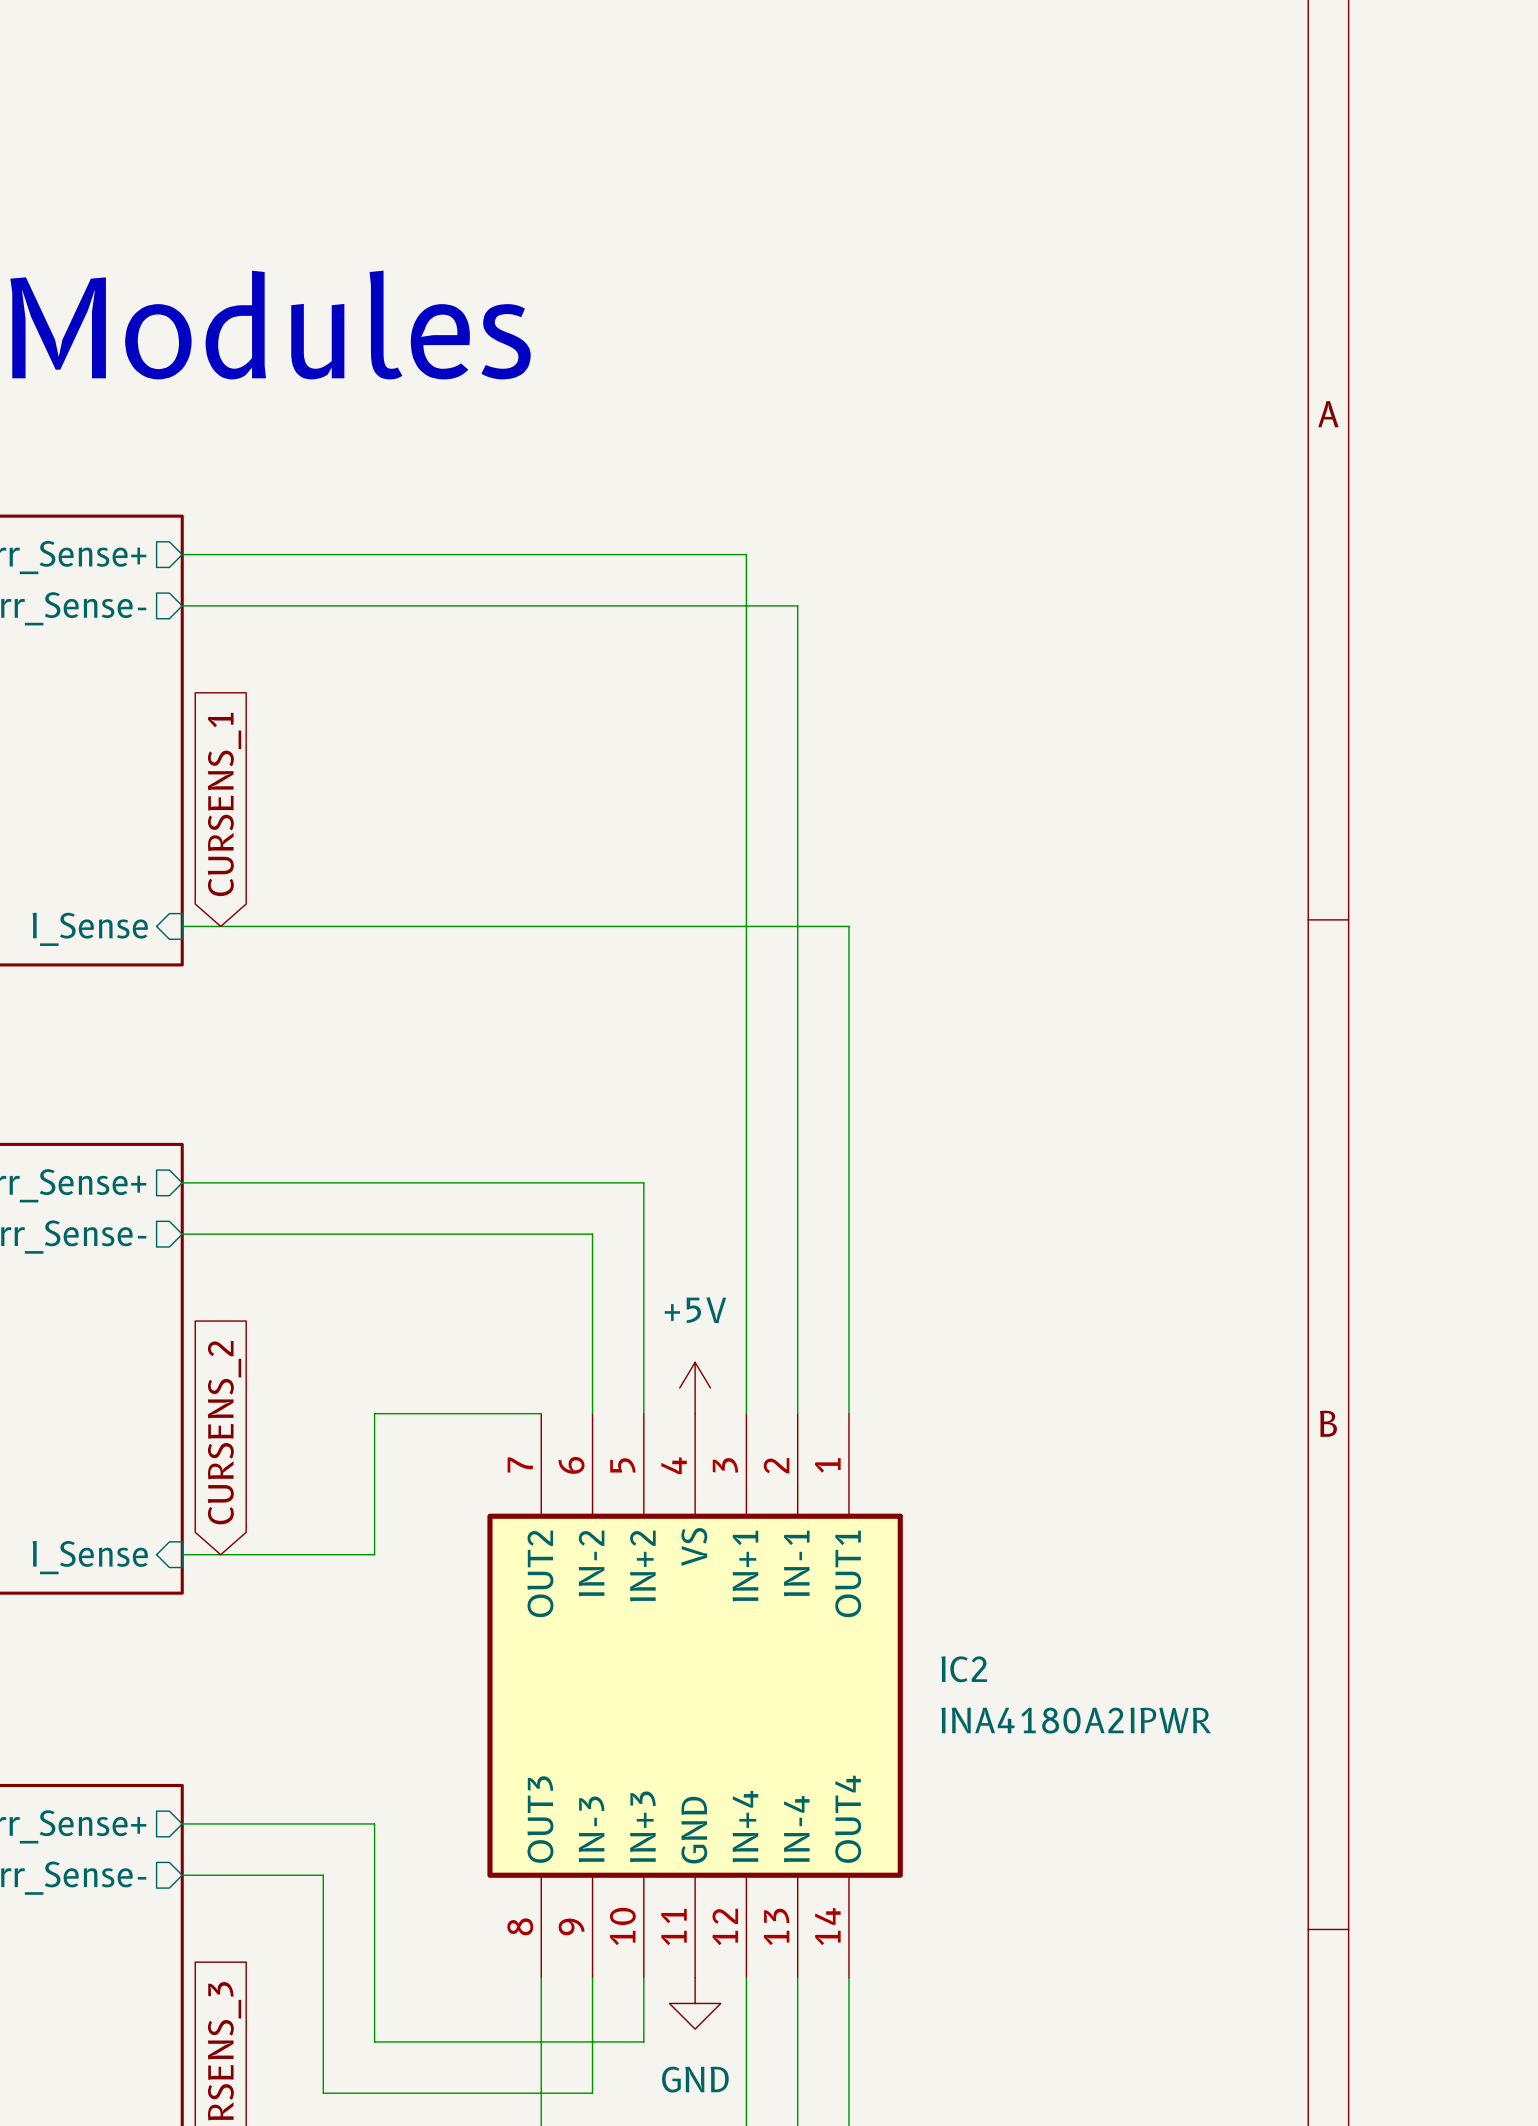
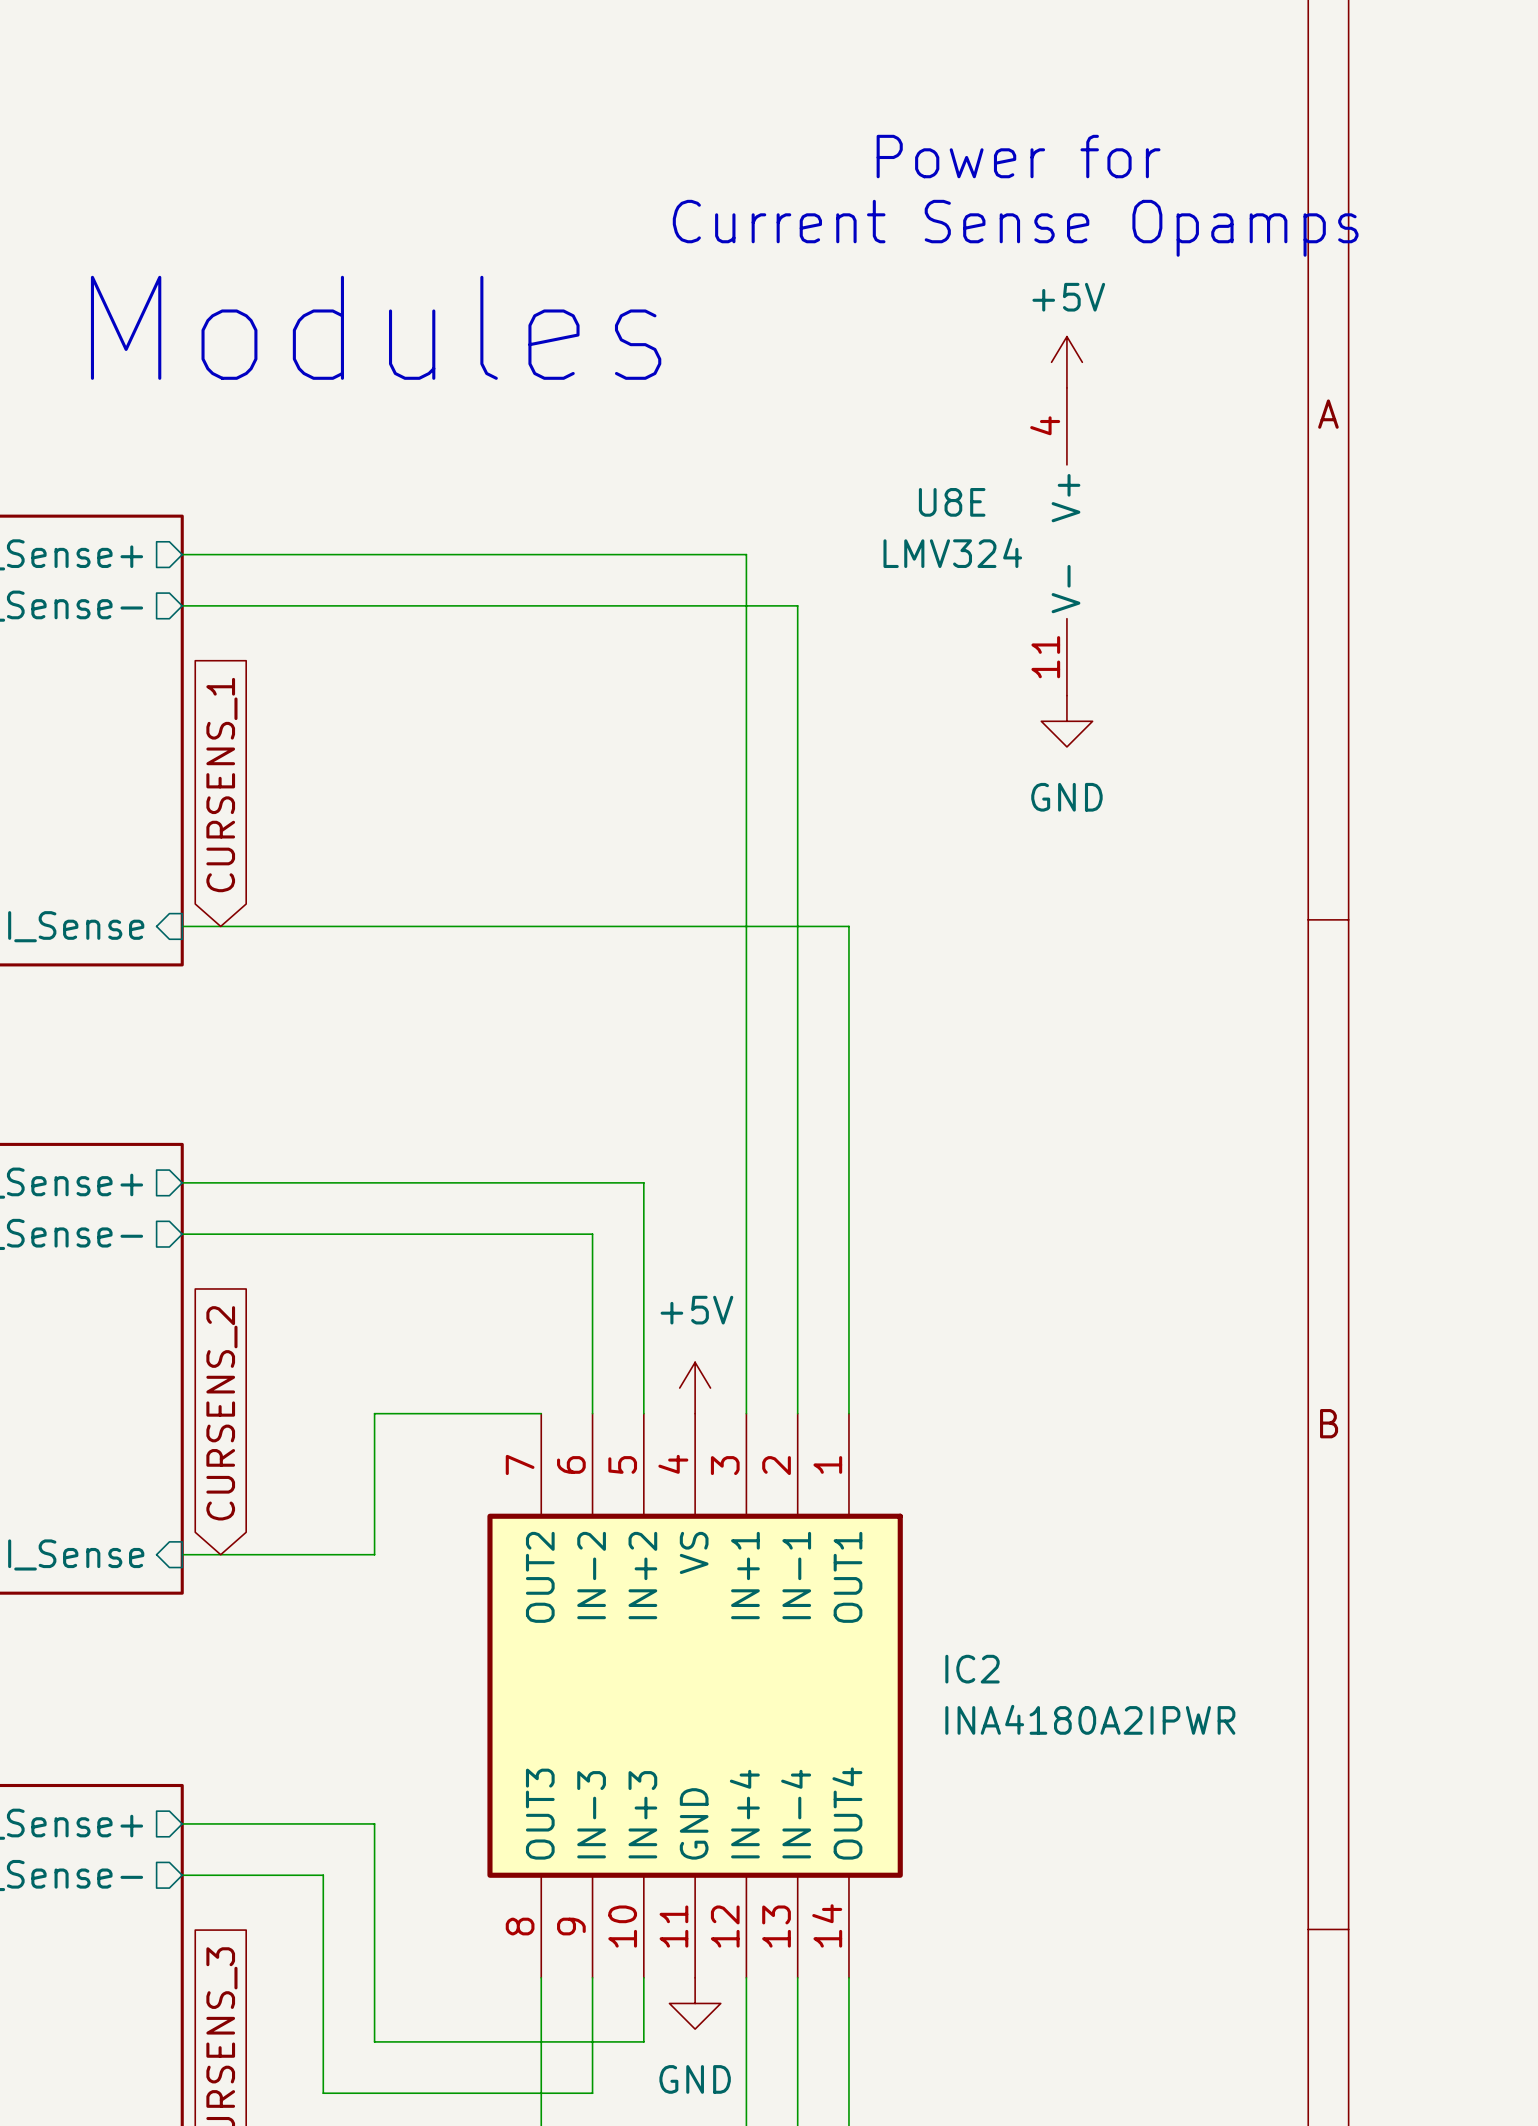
text: none -> Power for (1018, 156)
text: none -> Current Sense Opamps (1015, 228)
power symbol: none -> +5V (1066, 362)
U8E: none -> LMV324 (1066, 541)
power symbol: none -> GND (1066, 721)

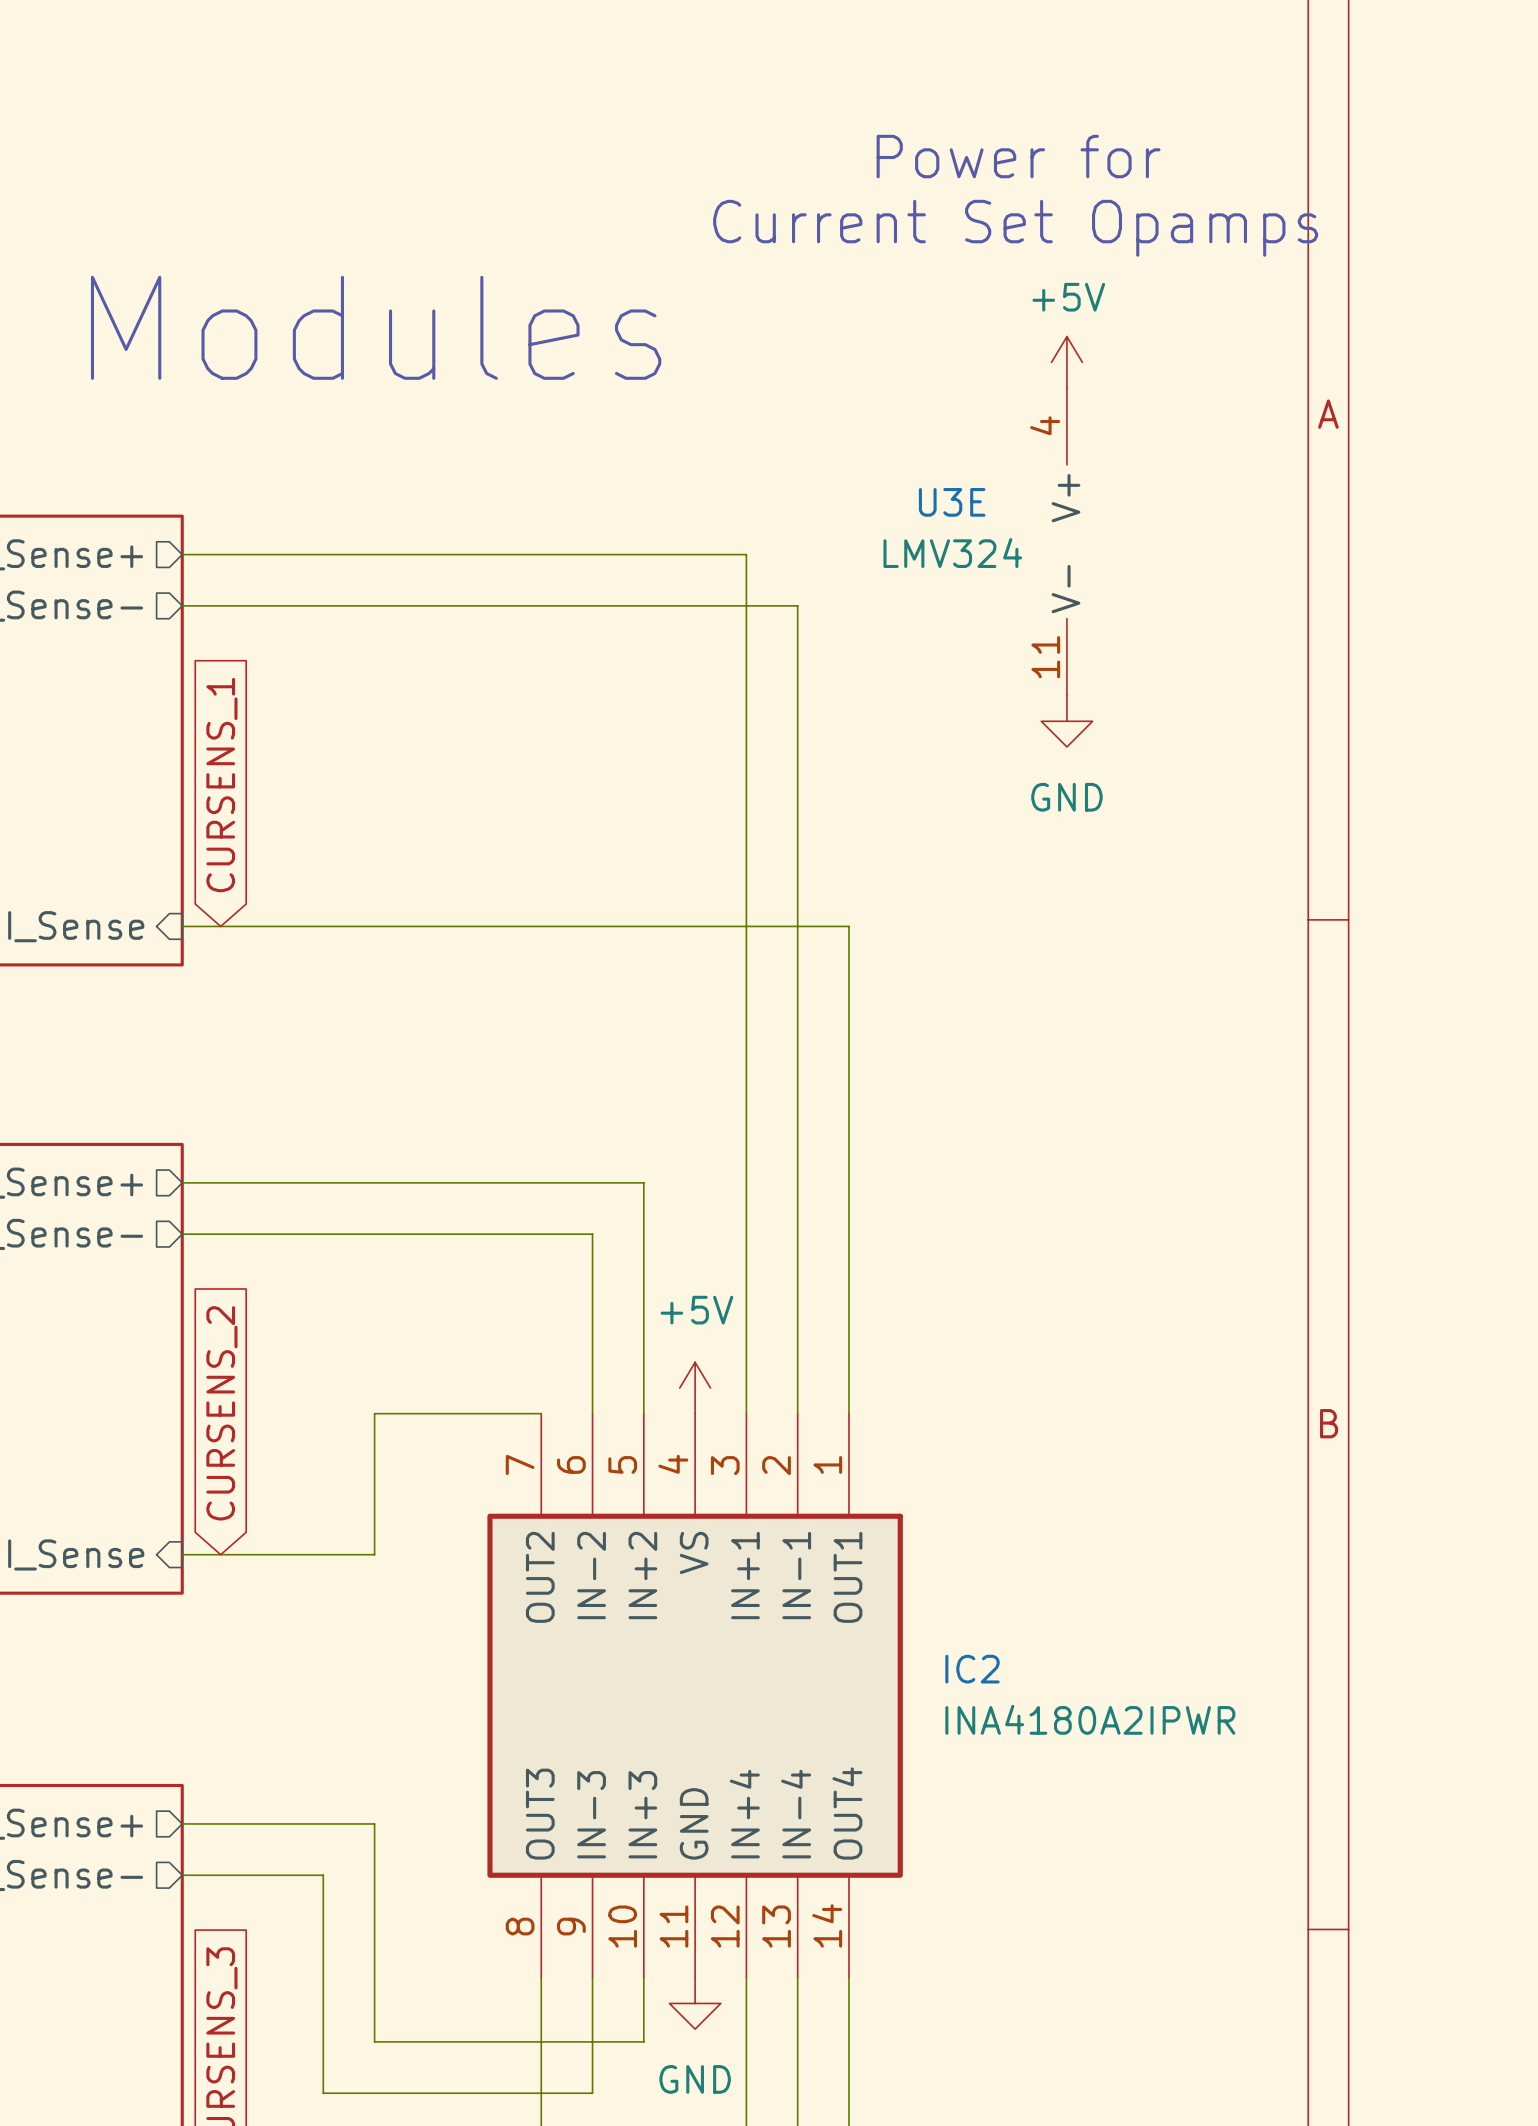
text: Current Sense Opamps (1015, 228) -> Current Set Opamps (1015, 228)
U8E name: U8E (952, 502) -> U3E (952, 502)

